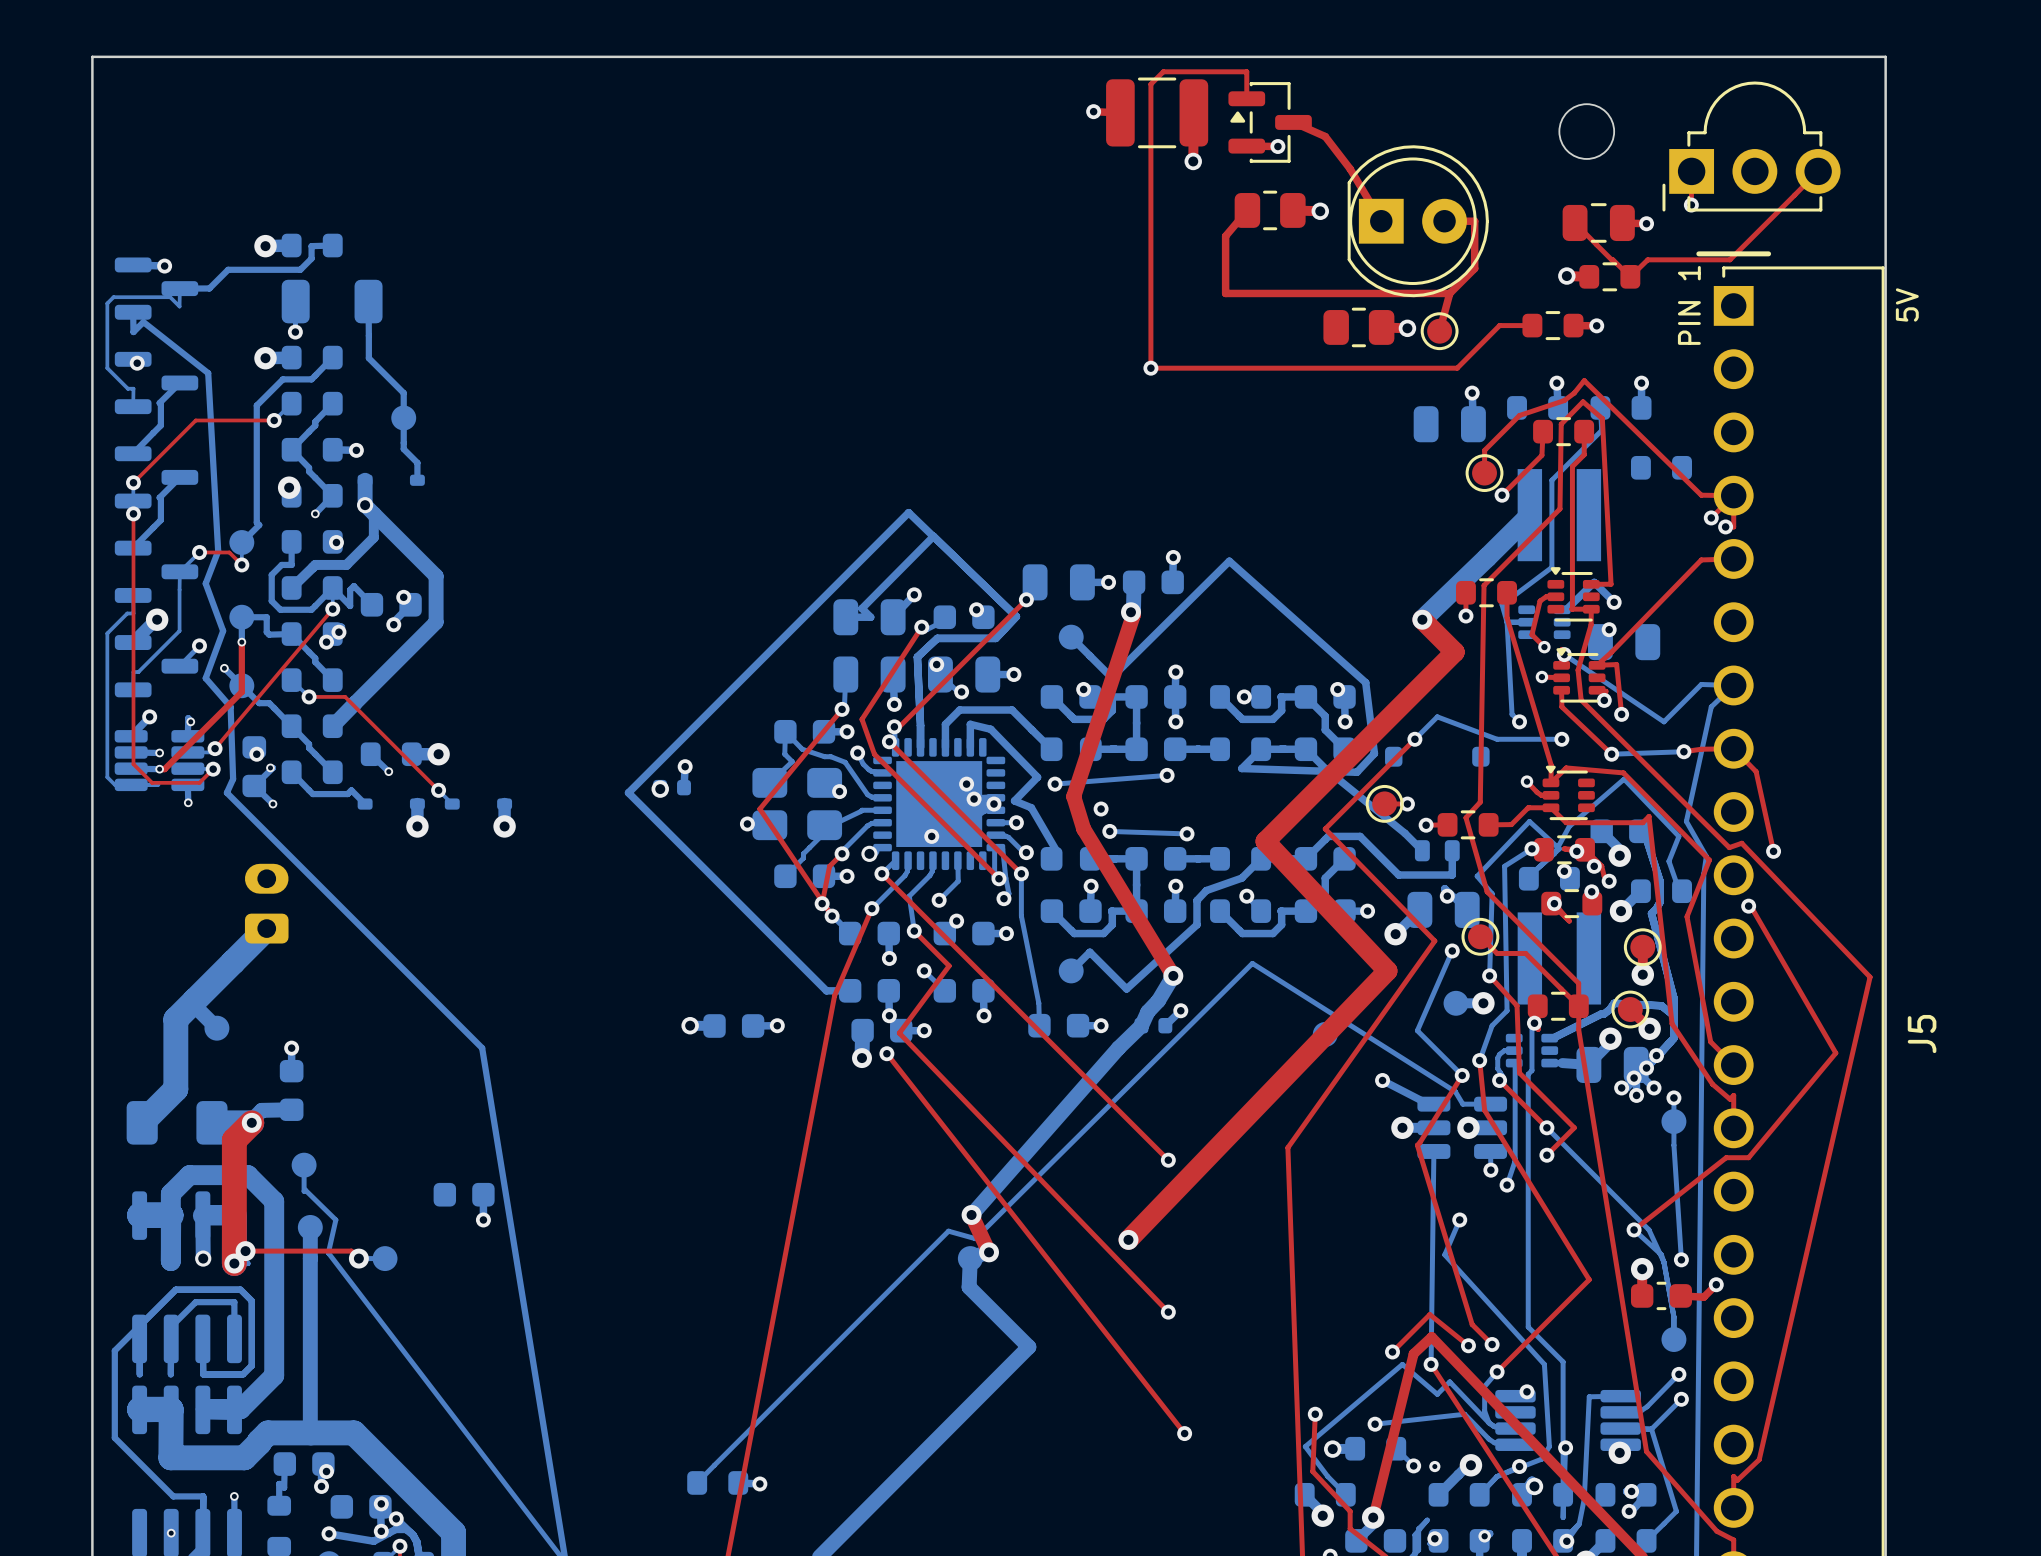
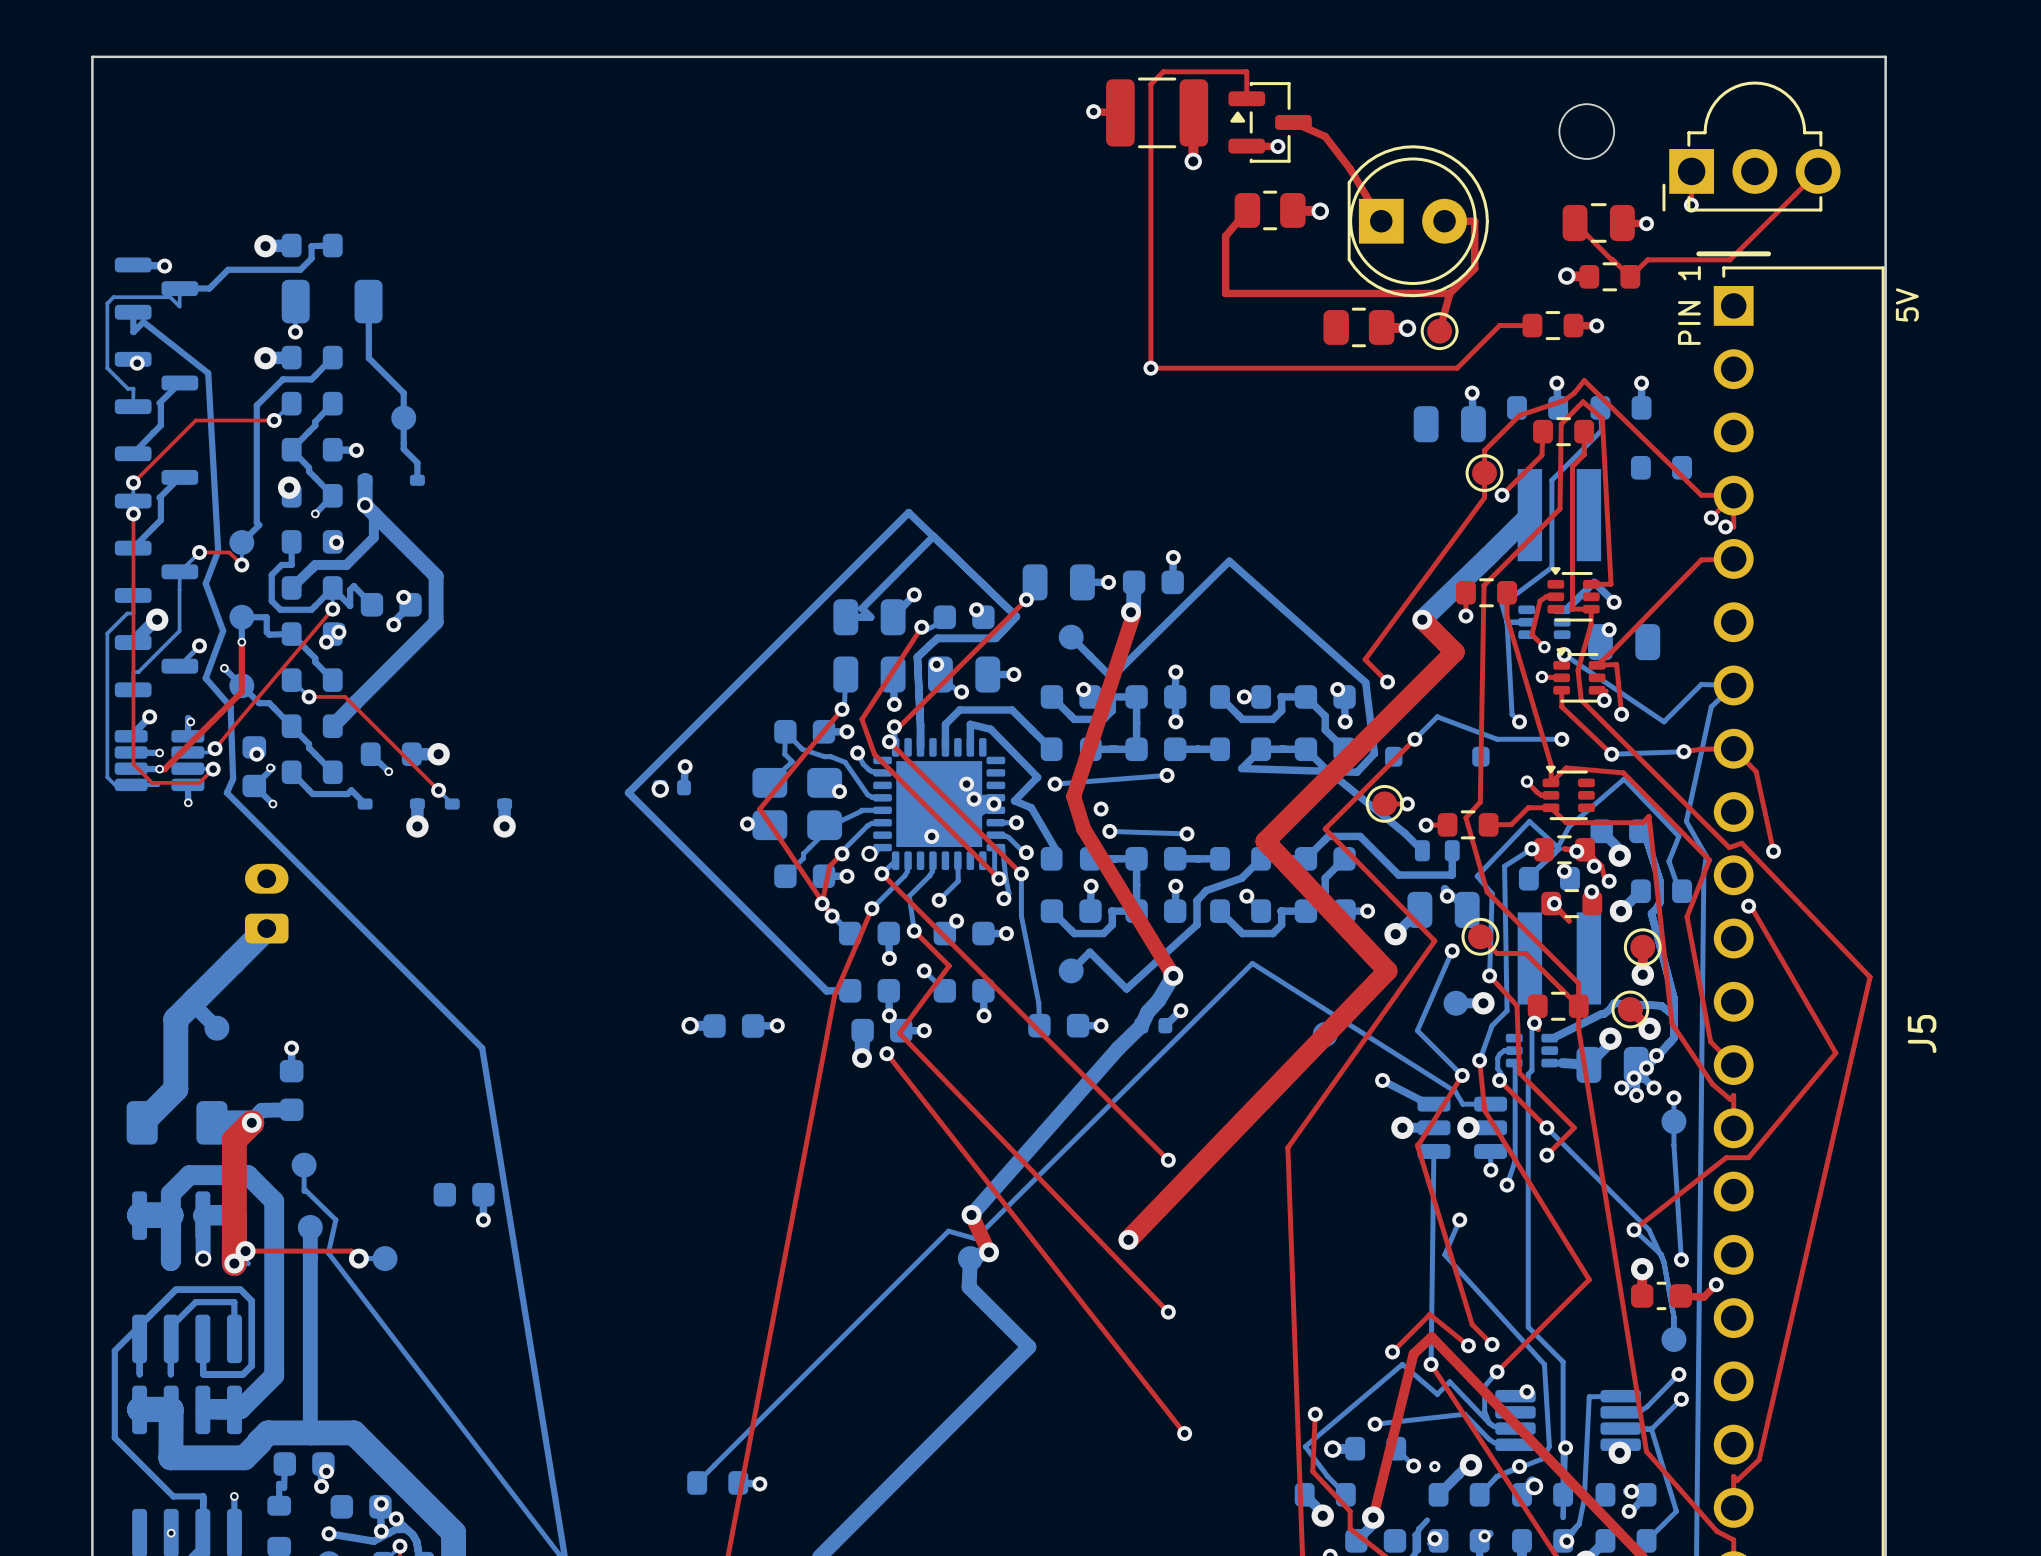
top track: none -> (1484, 473) (1484, 497) (1365, 659) (1387, 682)
via: none -> (1387, 682)

